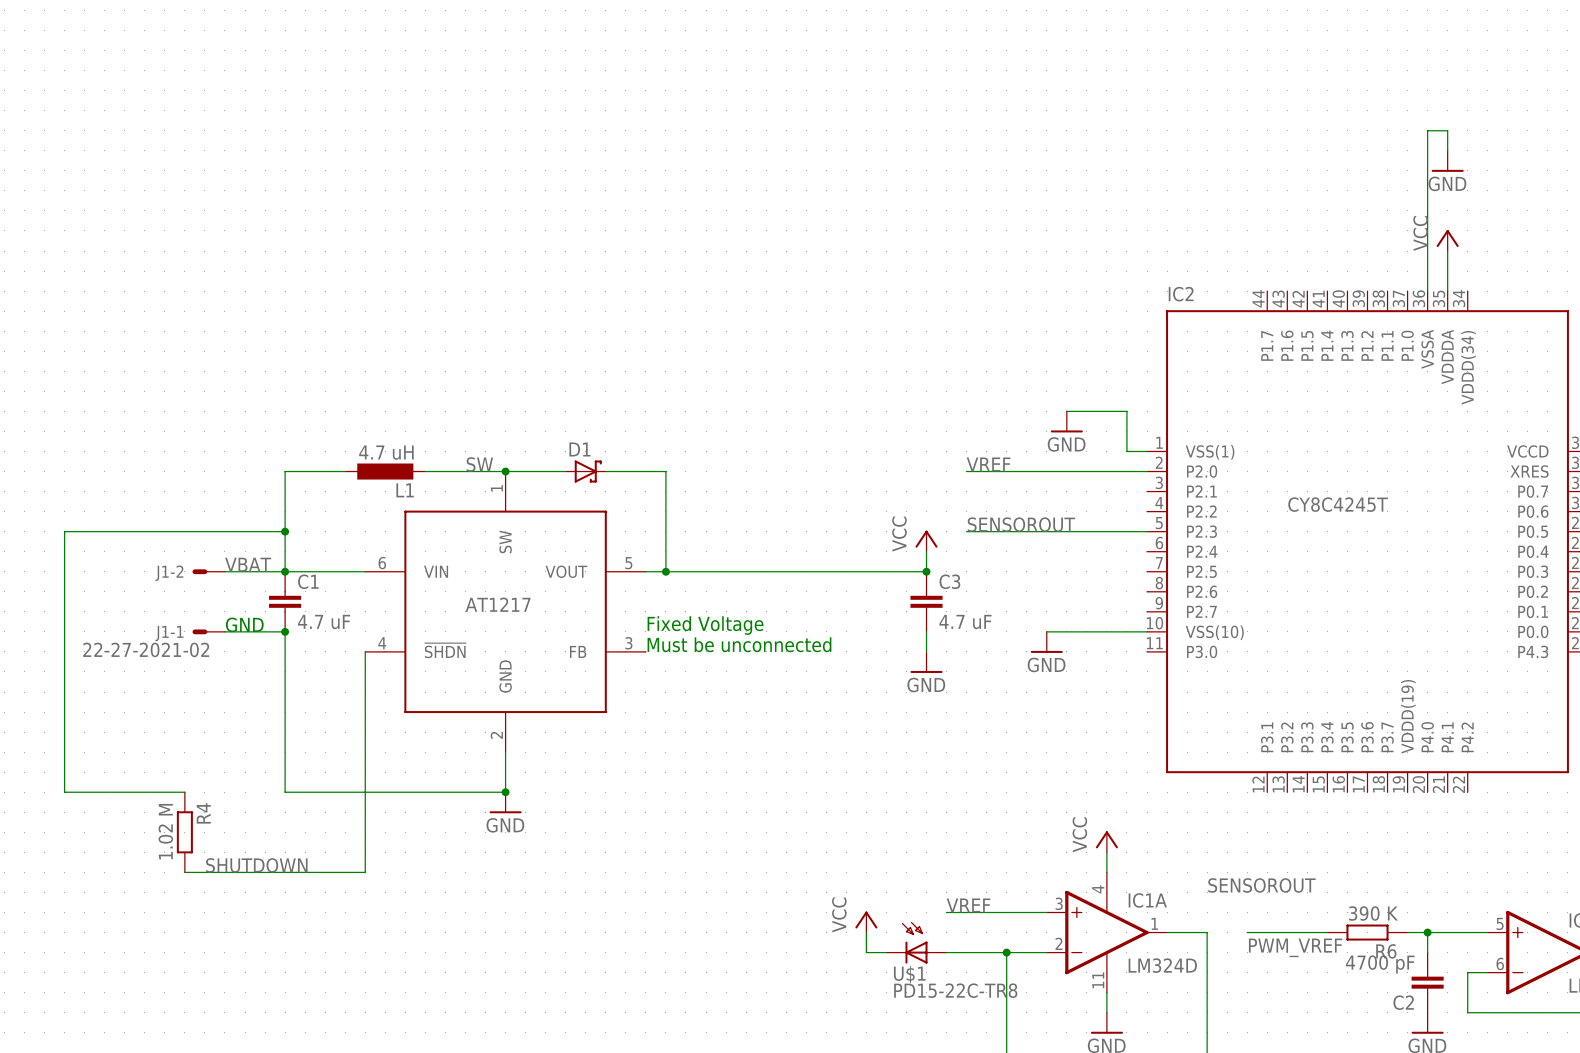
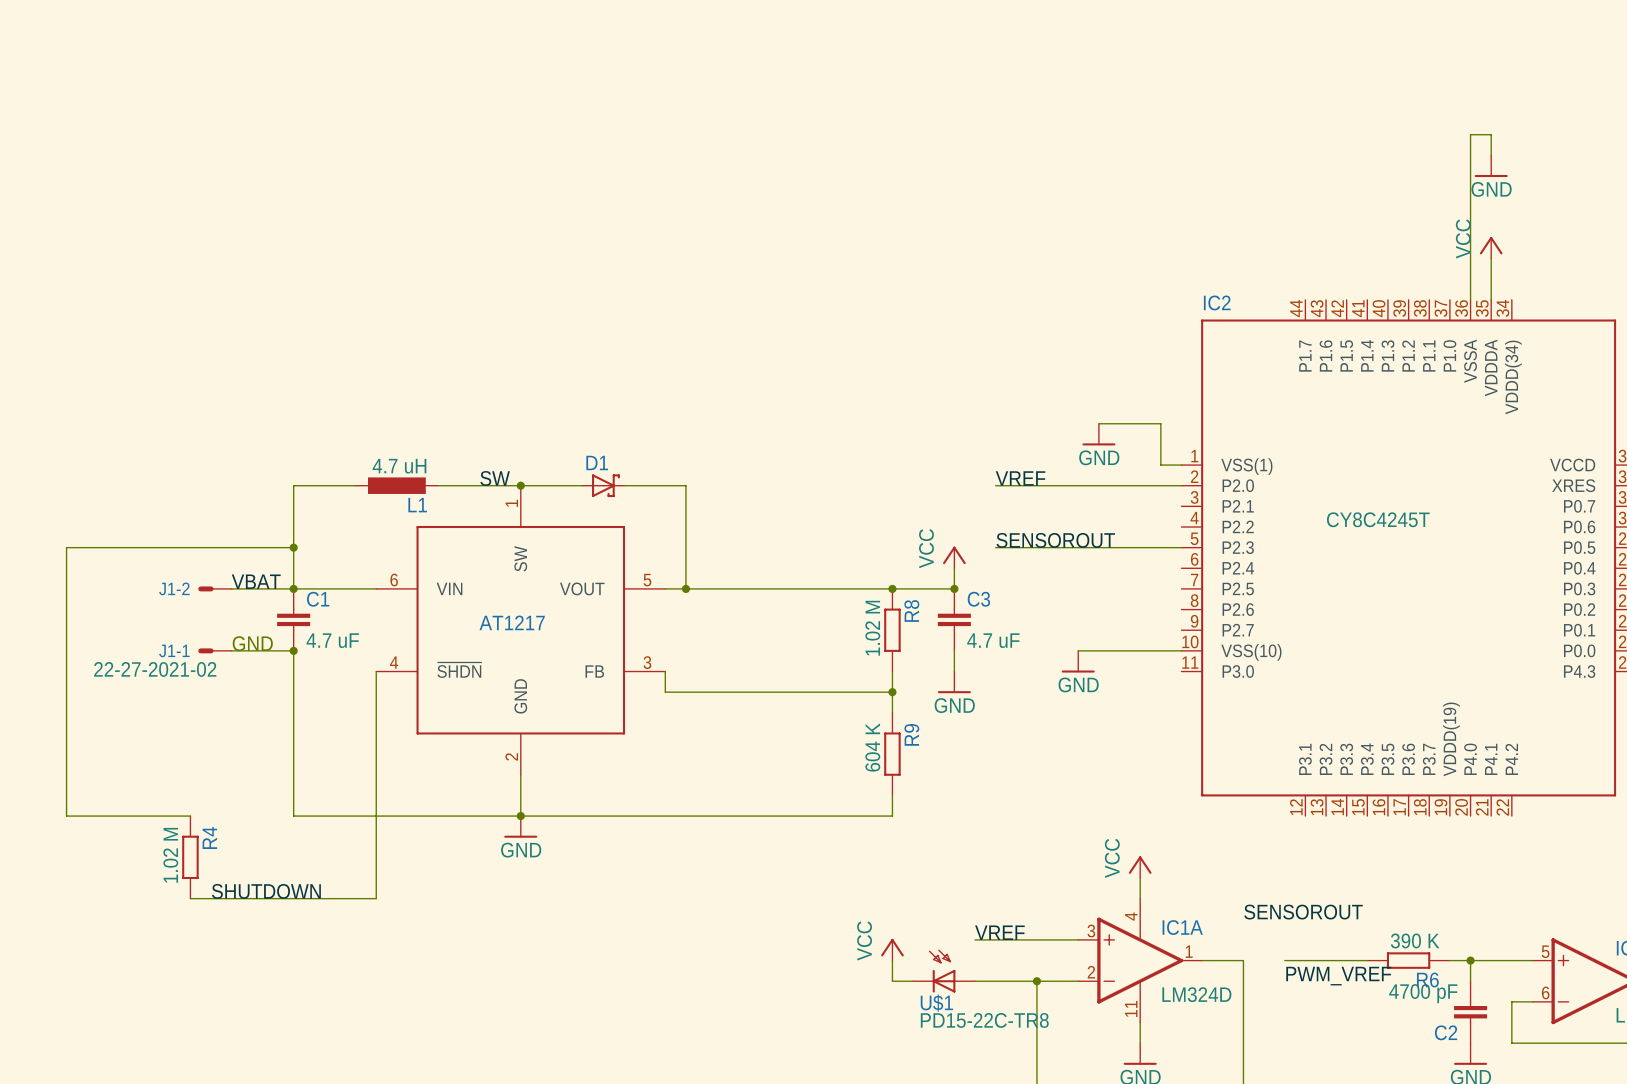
junction: none -> (892, 588)
R8: none -> 1.02 M (892, 630)
text: Fixed Voltage (705, 625) -> none
text: Must be unconnected (739, 644) -> none
wire: none -> (665, 671) (665, 692) (892, 692)
wire: none -> (892, 671) (892, 712)
junction: none -> (892, 692)
R9: none -> 604 K (892, 754)
wire: none -> (892, 795) (892, 816) (520, 816)

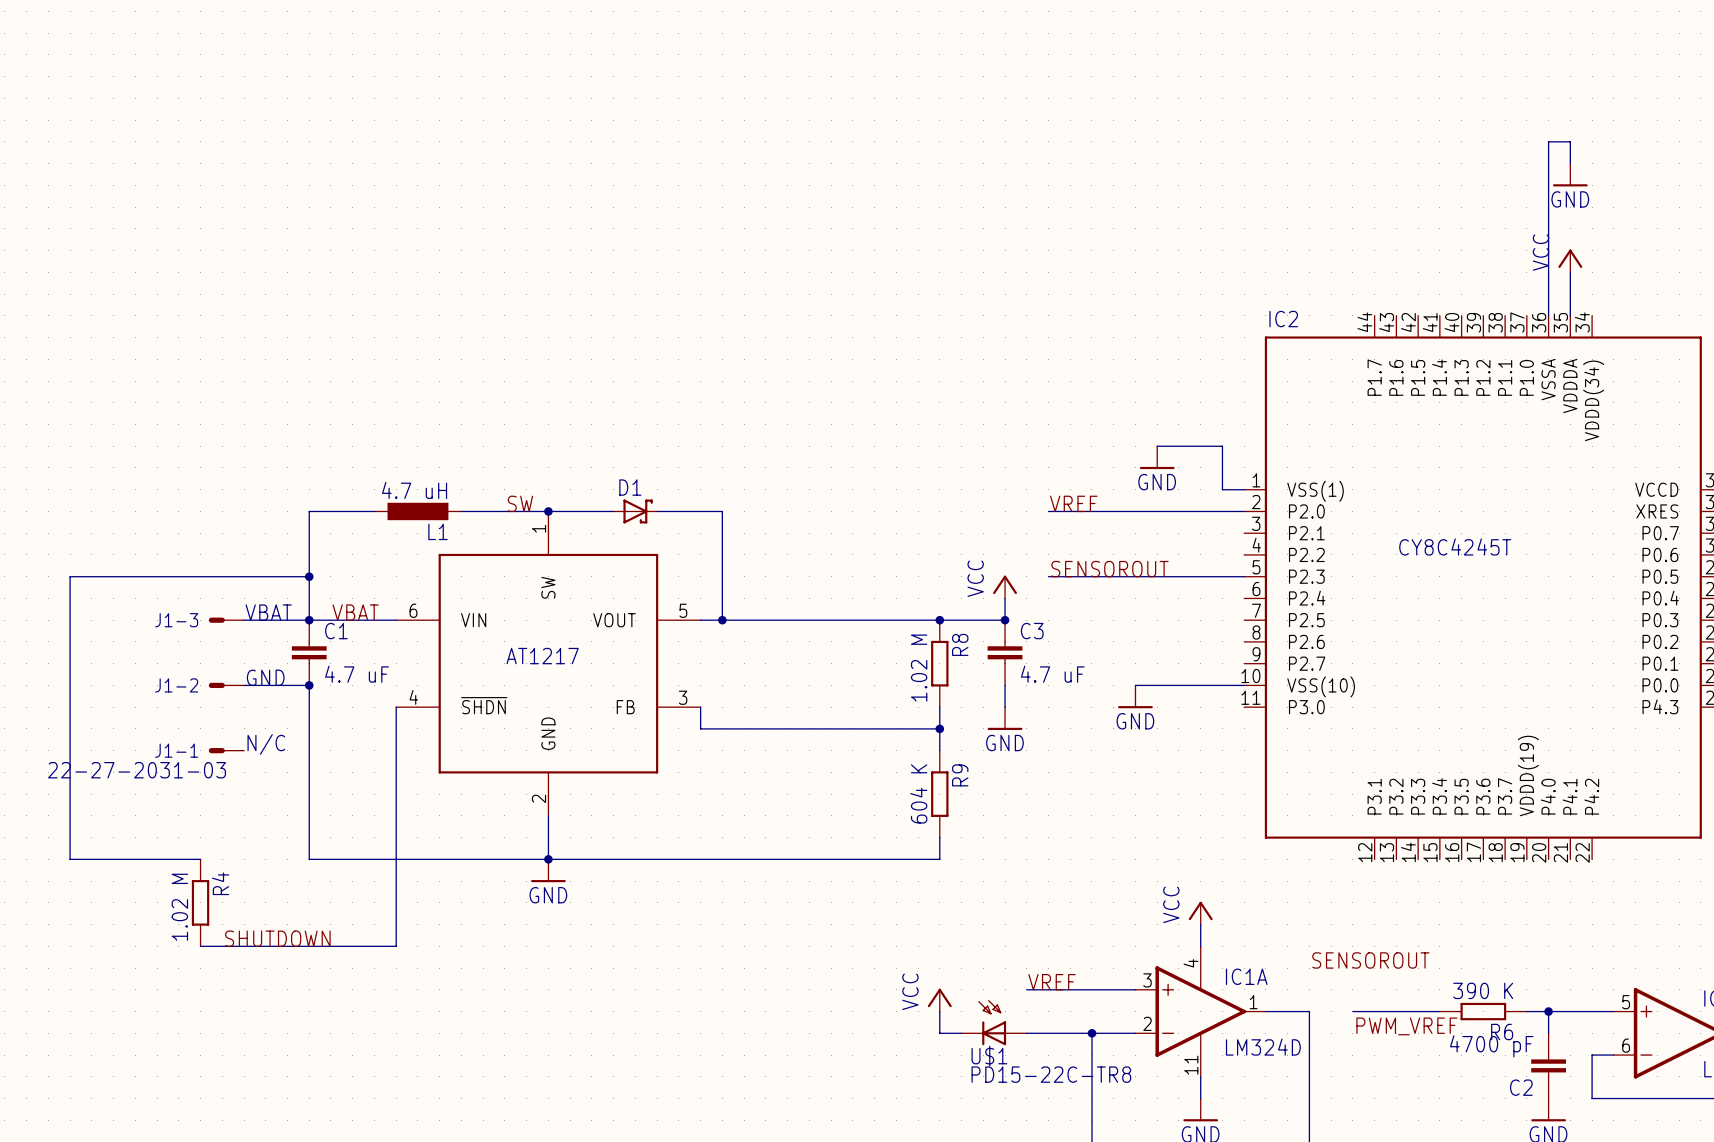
label position: VBAT (256, 581) -> VBAT (355, 612)
text: none -> VBAT (268, 612)
J1-2 name: J1-2 (174, 588) -> J1-3 (176, 620)
J1-1 name: J1-1 (174, 650) -> J1-2 (176, 685)
J1-1 value: 22-27-2021-02 (155, 669) -> none
text: none -> N/C (266, 744)
J1-1: none -> 22-27-2031-03 (226, 750)

